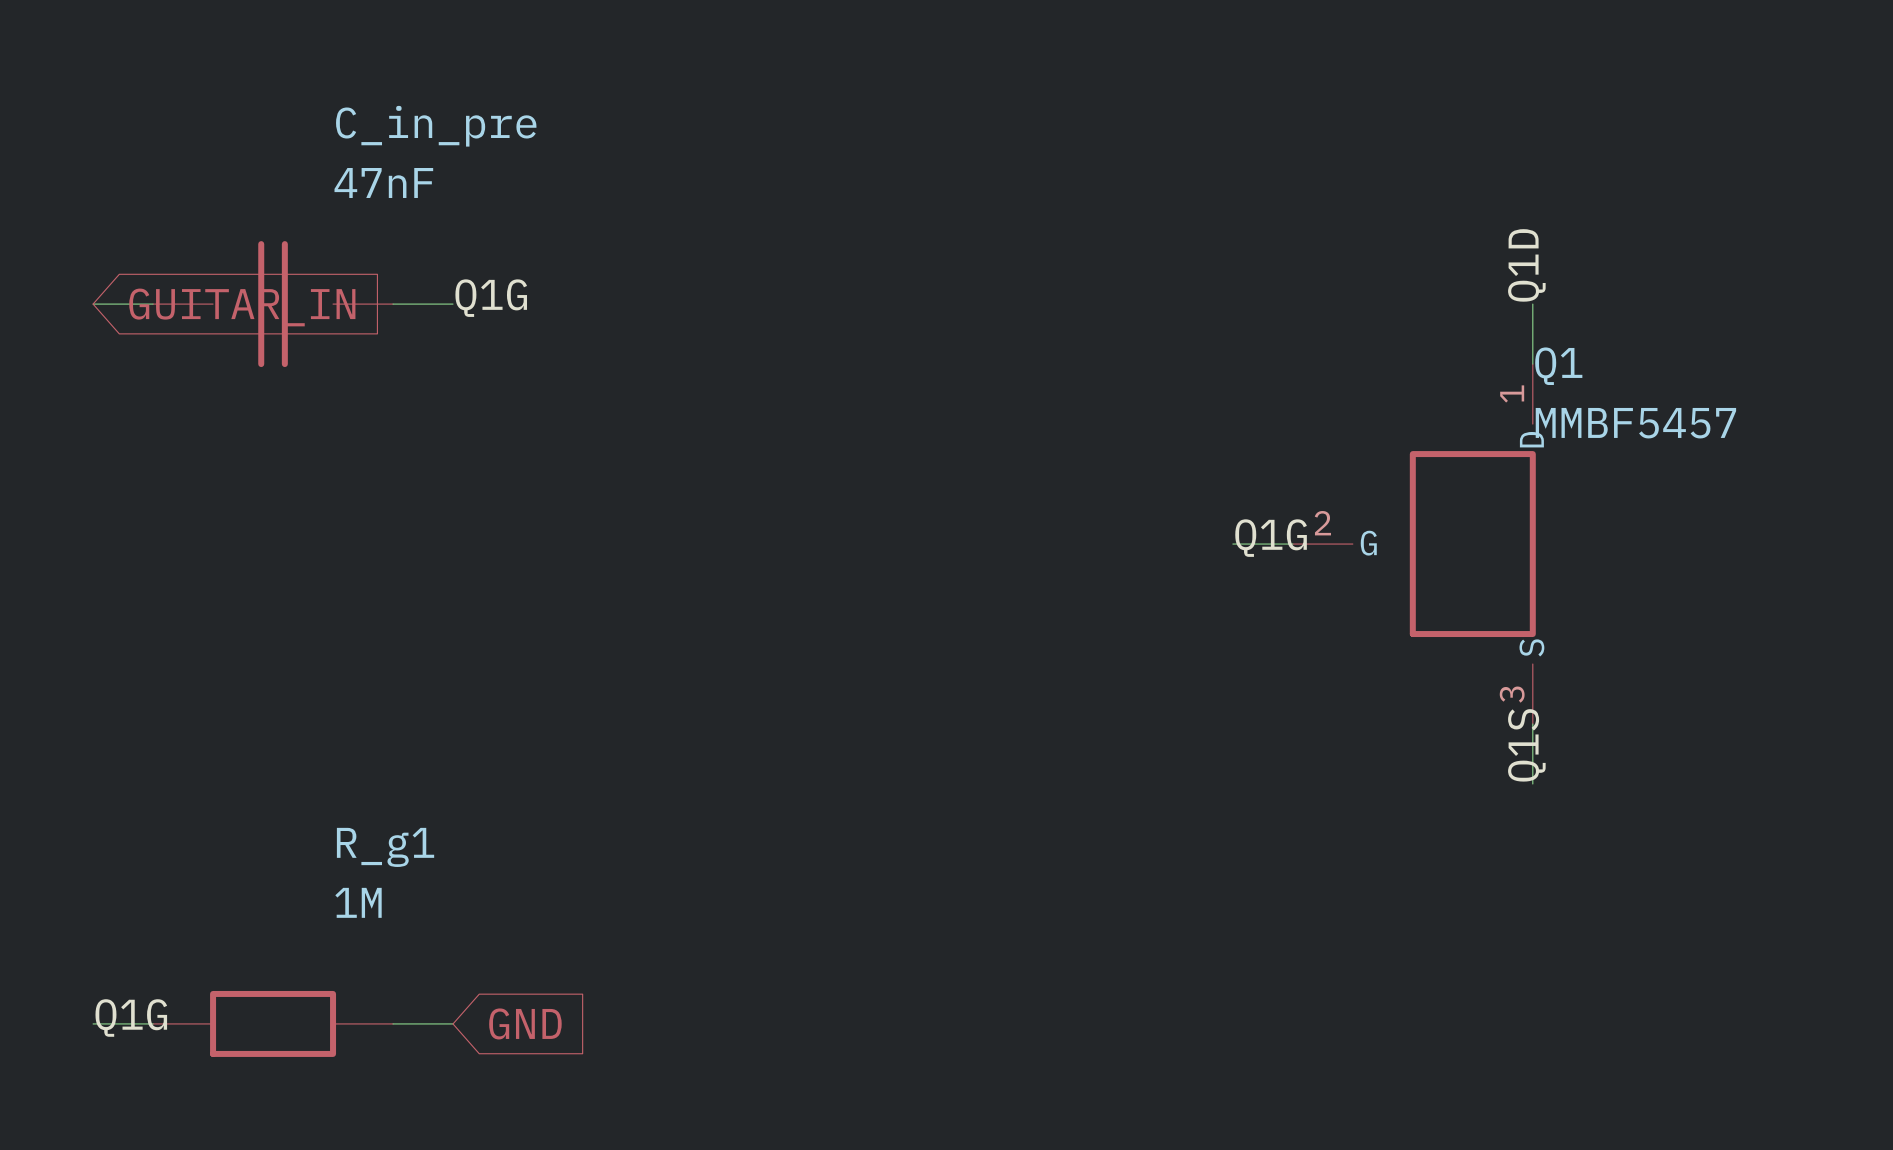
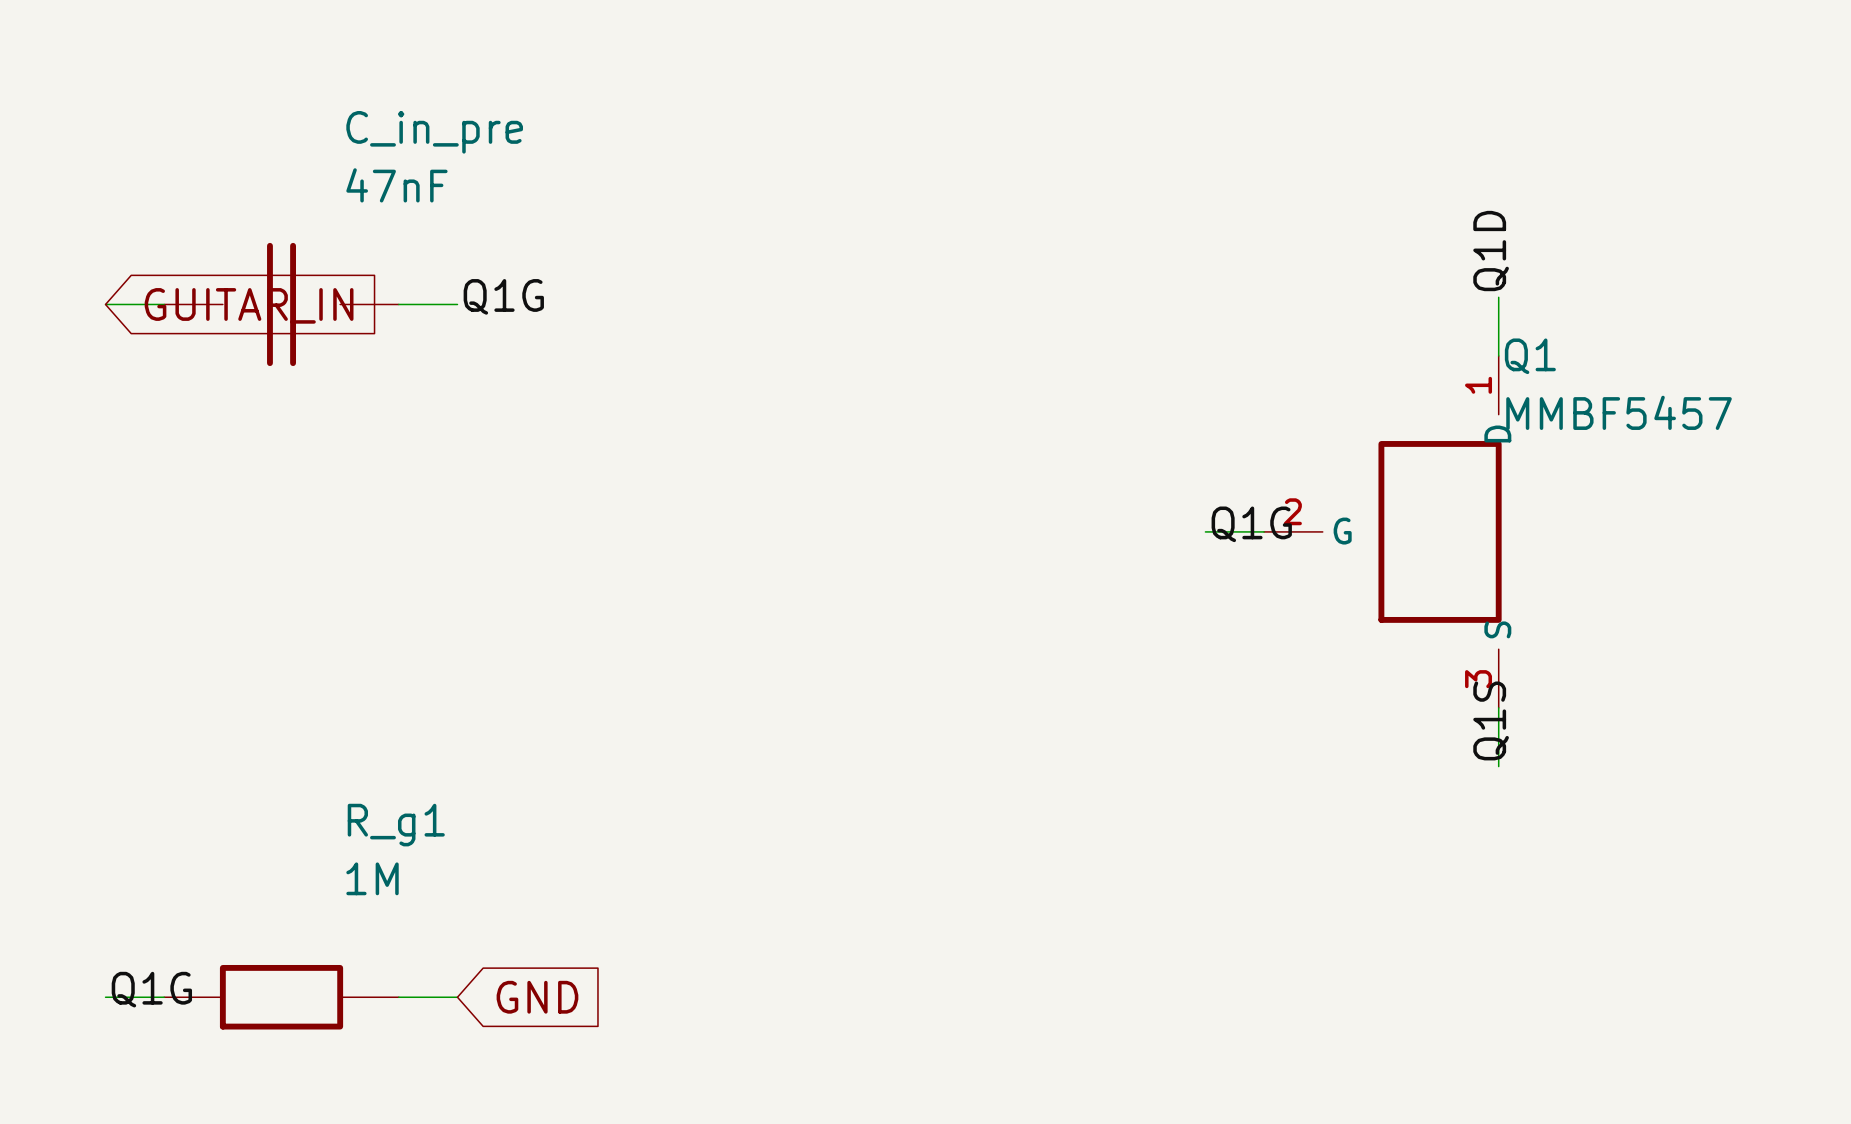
label position: Q1G (491, 298) -> Q1G (503, 296)
wire: (93, 304) (153, 304) -> (105, 304) (164, 304)
C_in_pre position: (273, 304) -> (281, 304)
wire: (393, 304) (453, 304) -> (398, 304) (457, 304)
global label position: GUITAR_IN (242, 307) -> GUITAR_IN (249, 305)
label position: Q1G (131, 1018) -> Q1G (151, 989)
wire: (93, 1023) (153, 1023) -> (105, 997) (164, 997)
R_g1 position: (273, 1023) -> (281, 997)
wire: (393, 1023) (453, 1023) -> (398, 997) (457, 997)
global label position: GND (525, 1023) -> GND (537, 997)

